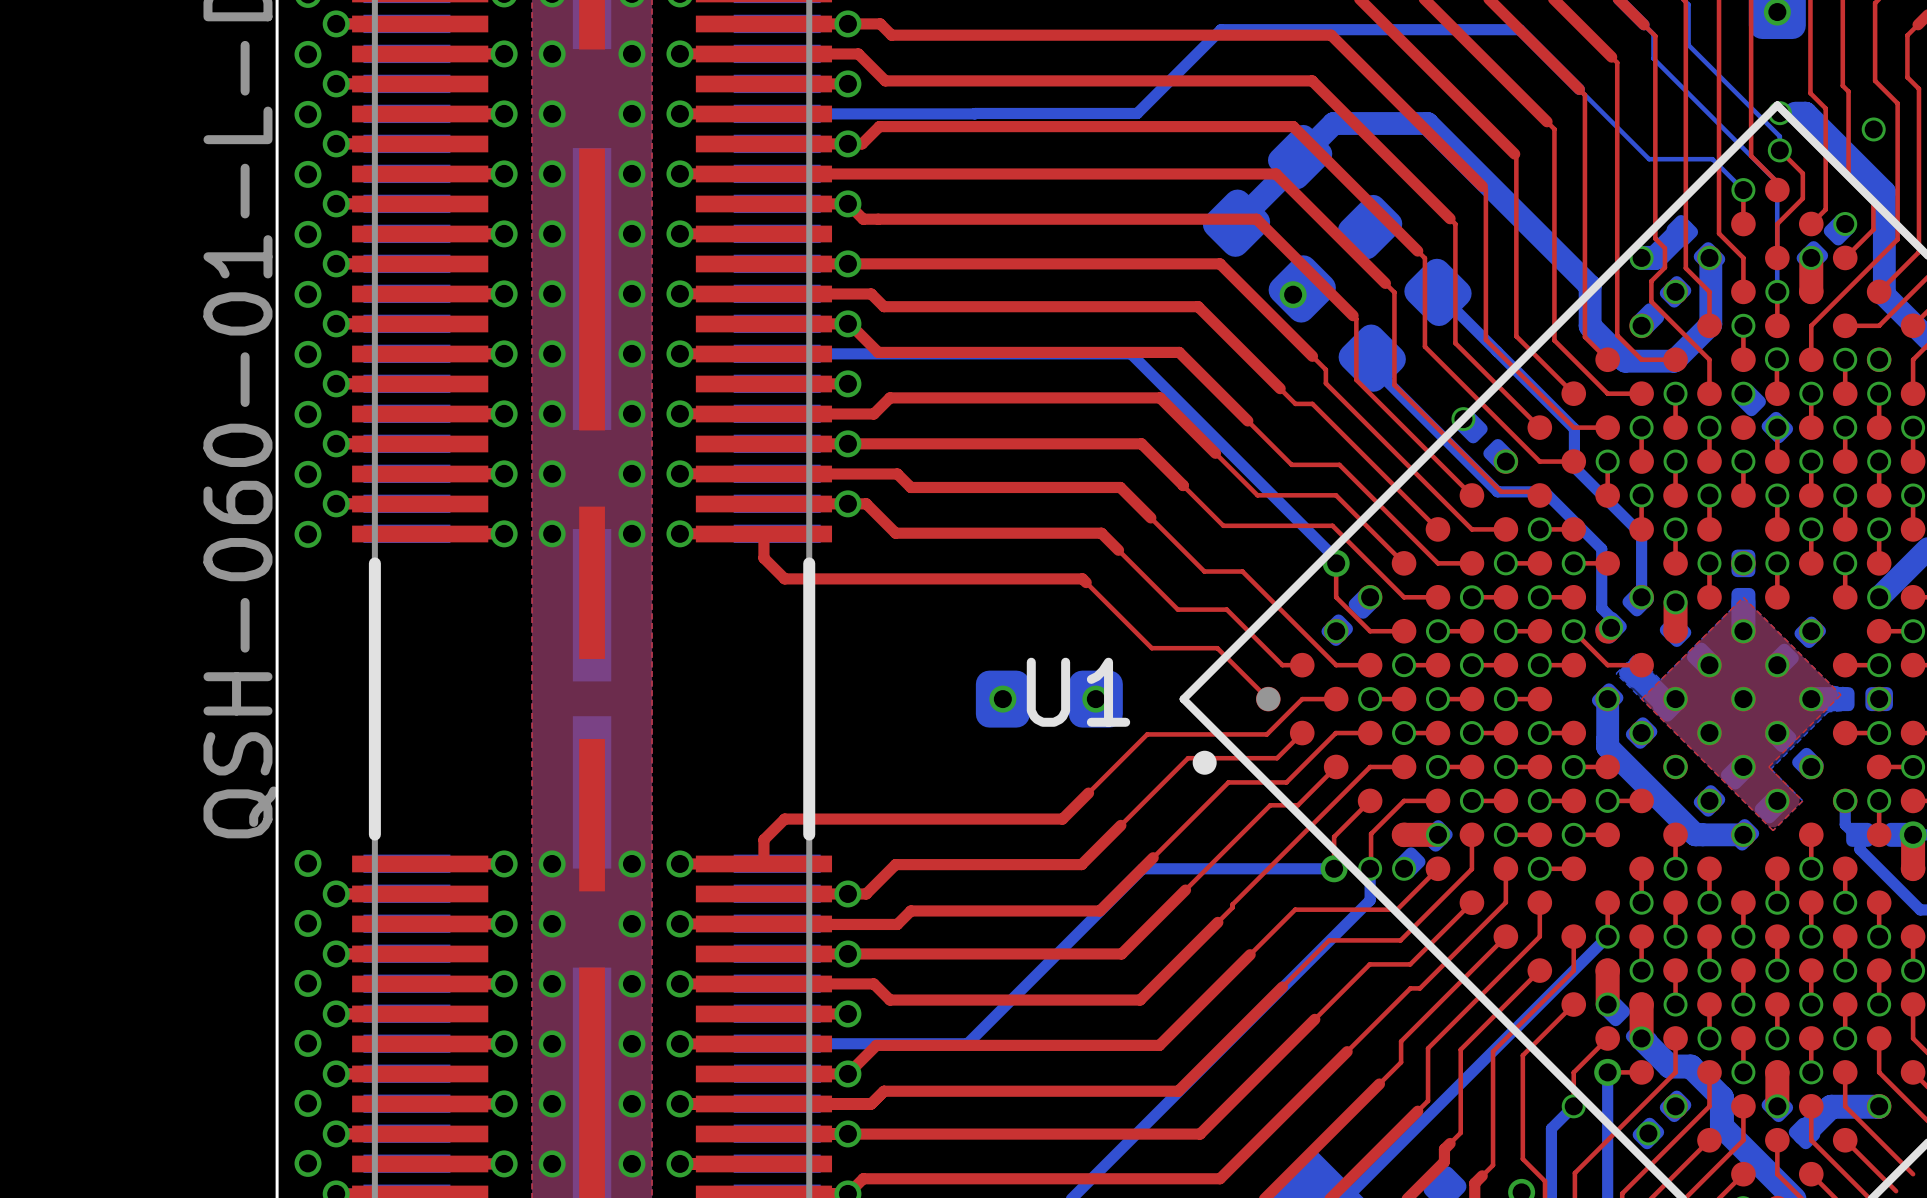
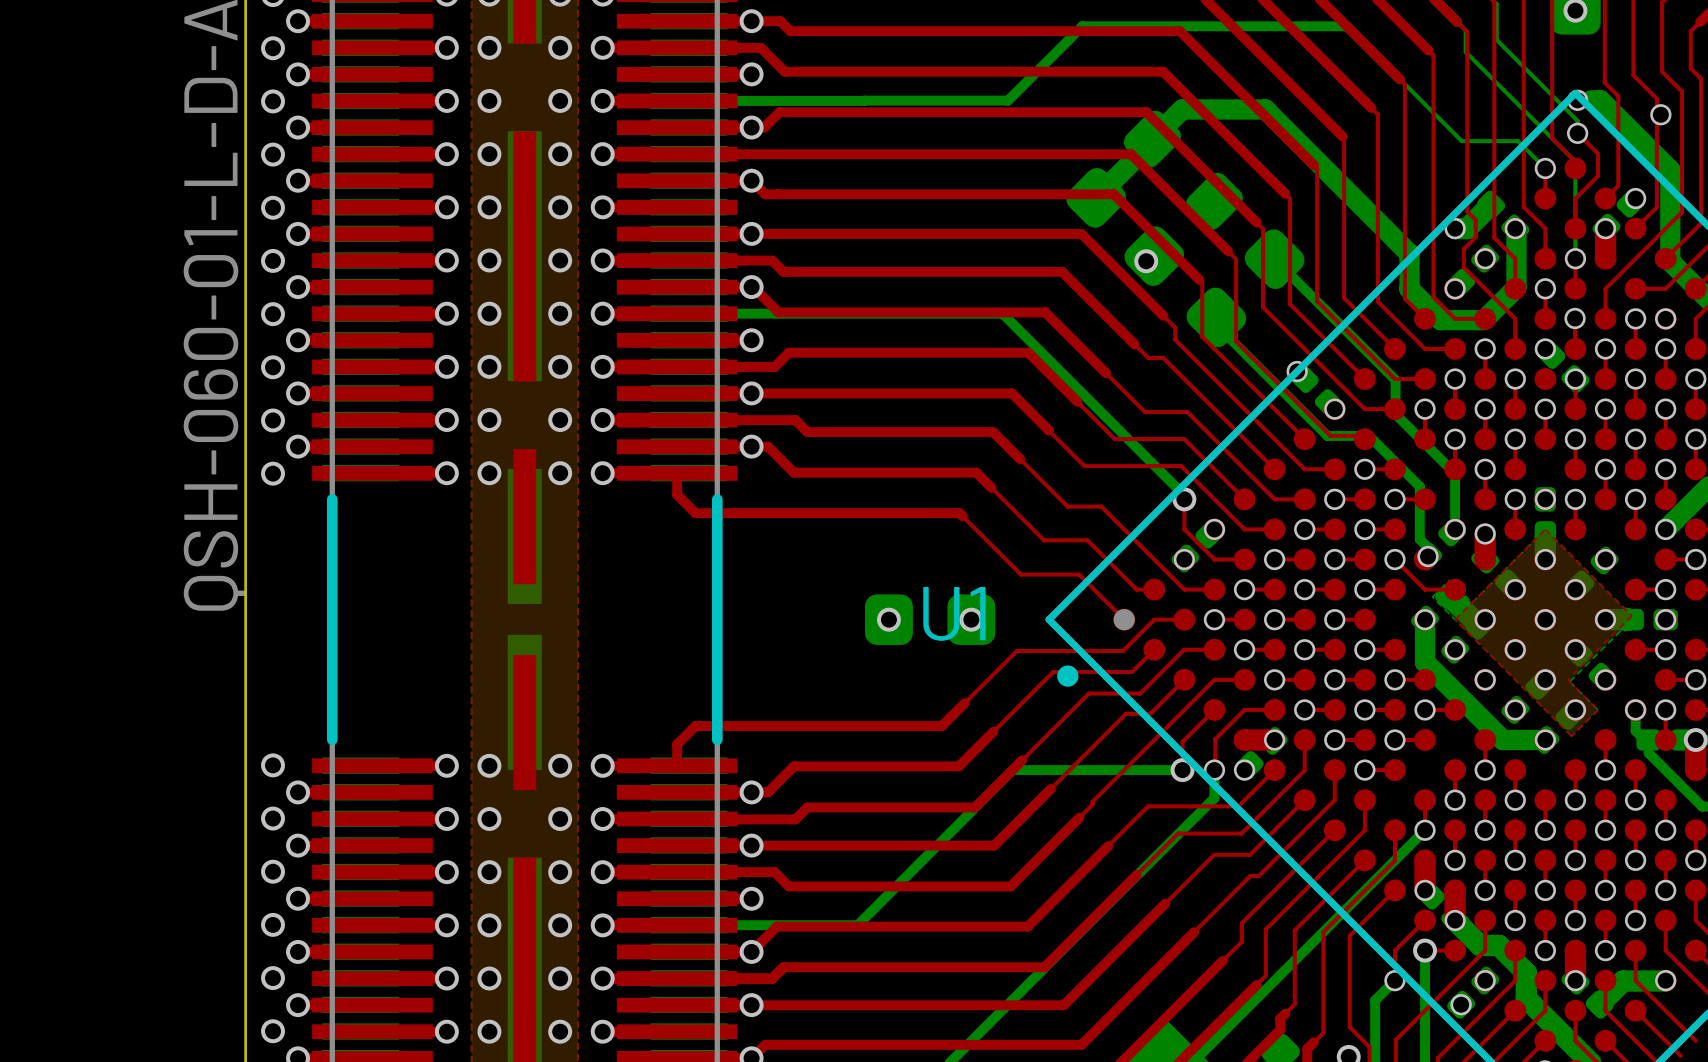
top track: (1848, 91) (1848, 175) (1873, 200) (1873, 229) (1869, 233) -> (1638, 81) (1656, 98) (1656, 207)

